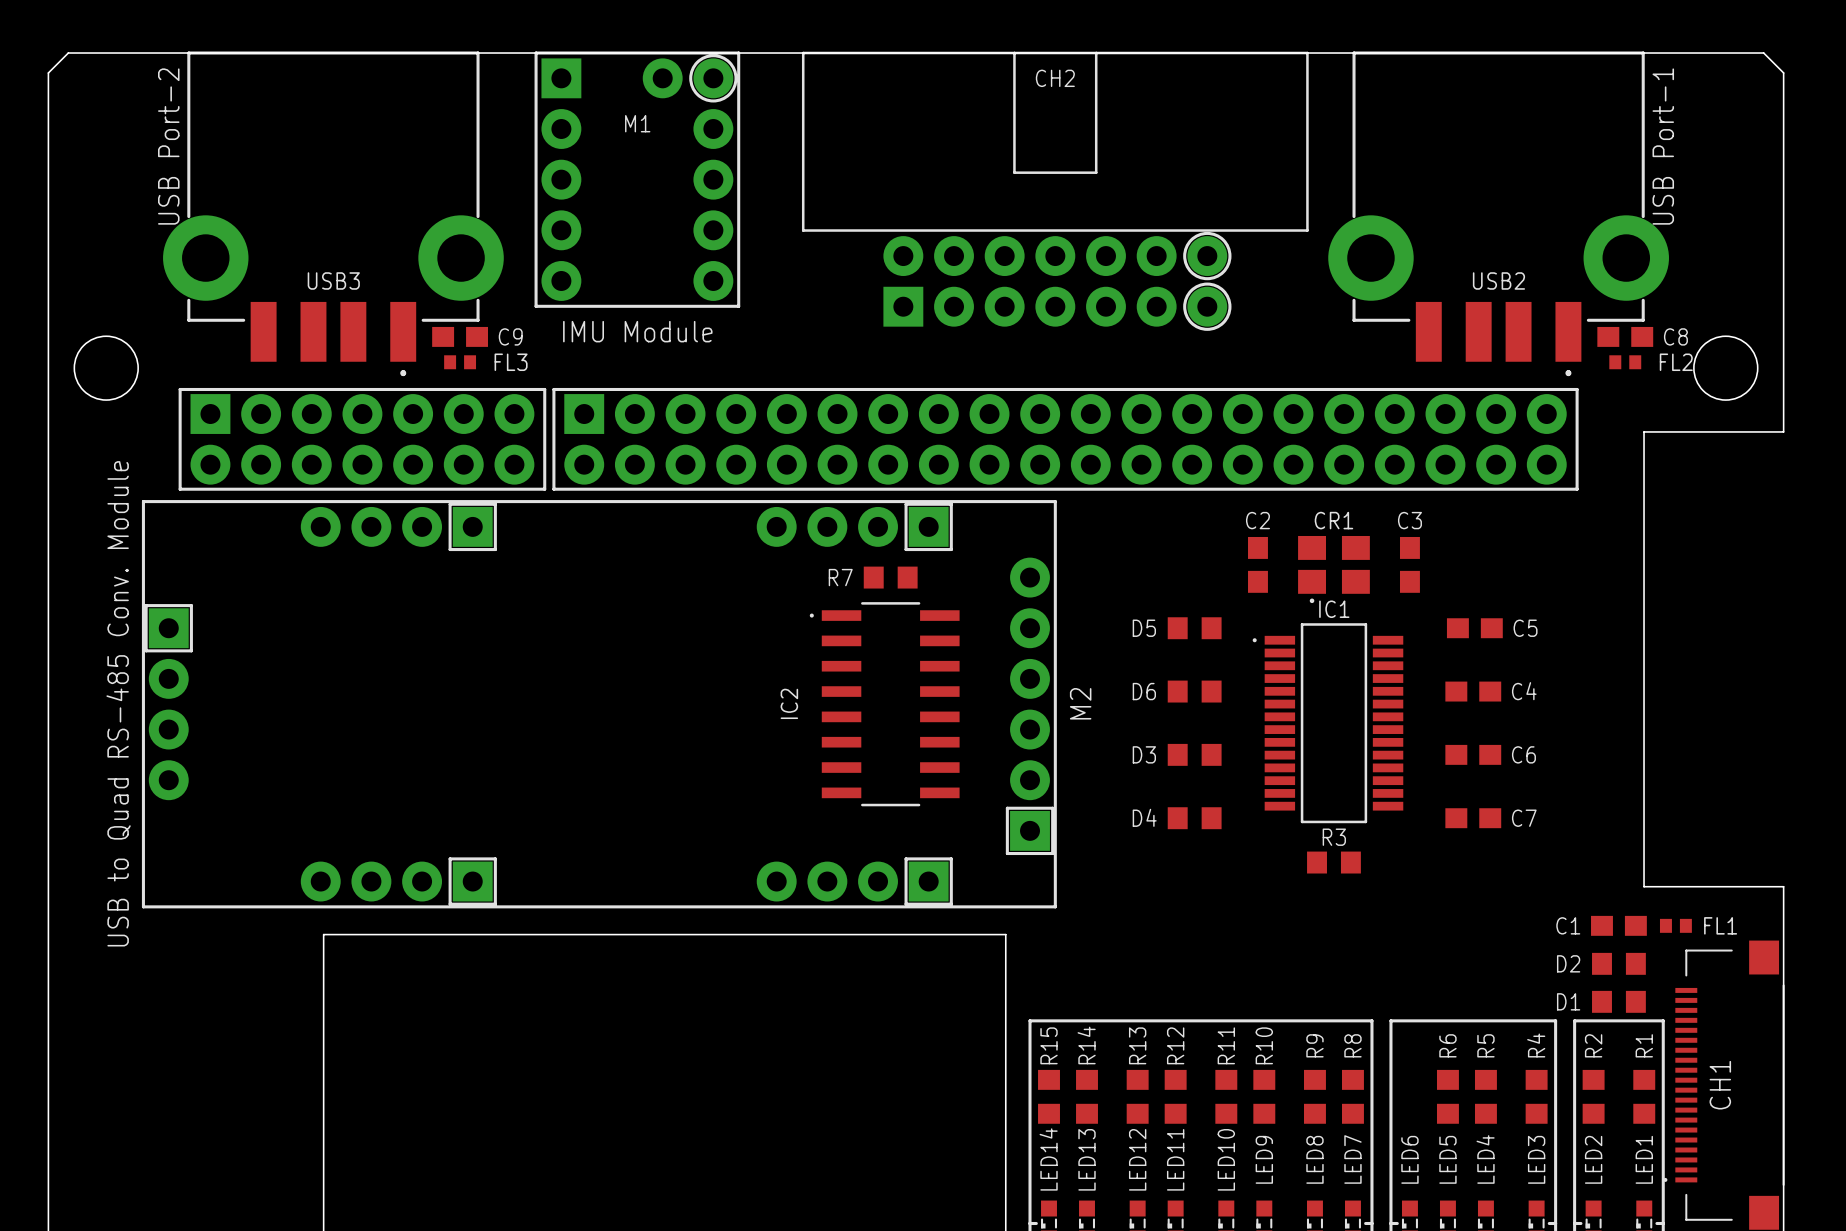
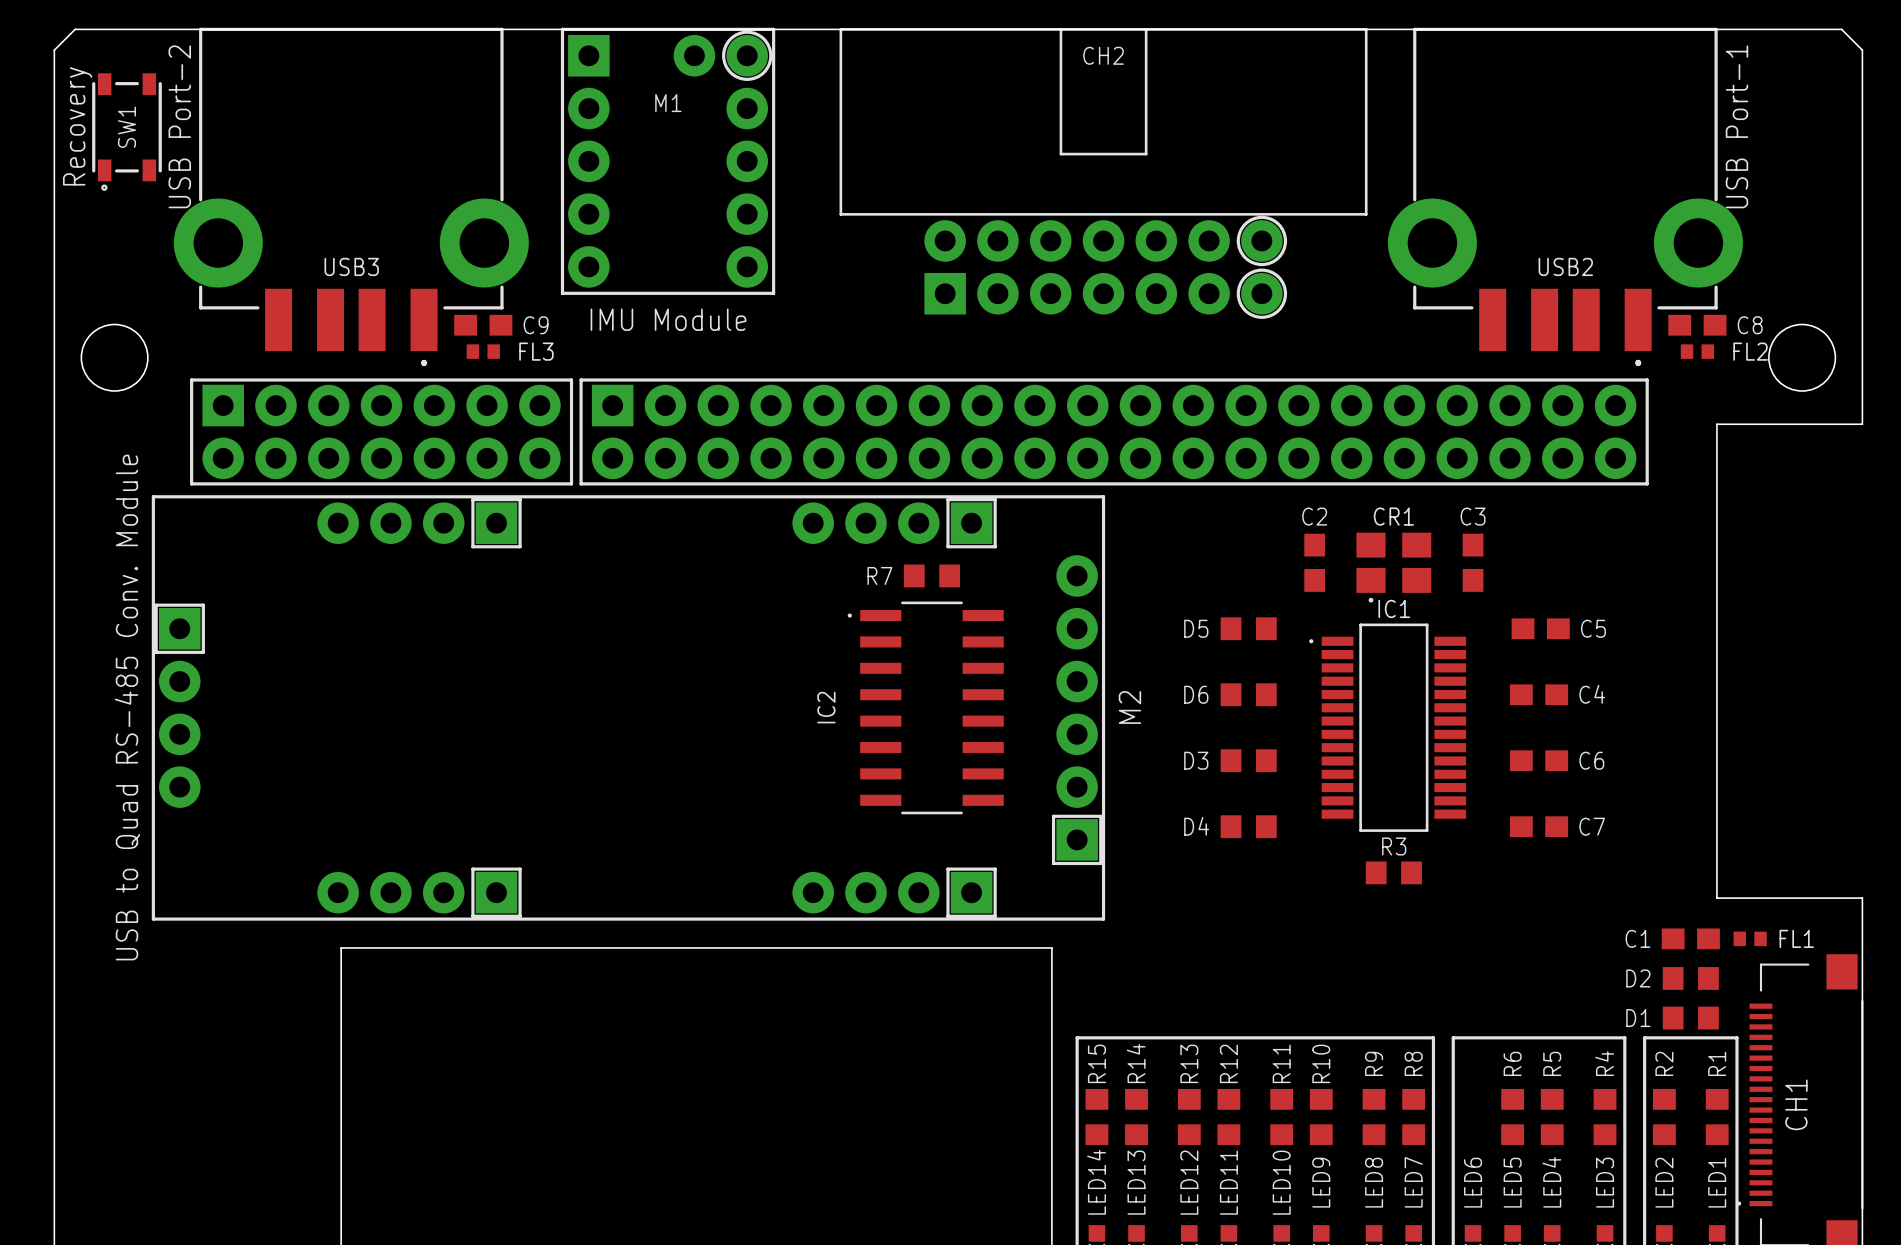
text: none -> Recovery (77, 126)
SW1: none -> (126, 132)

